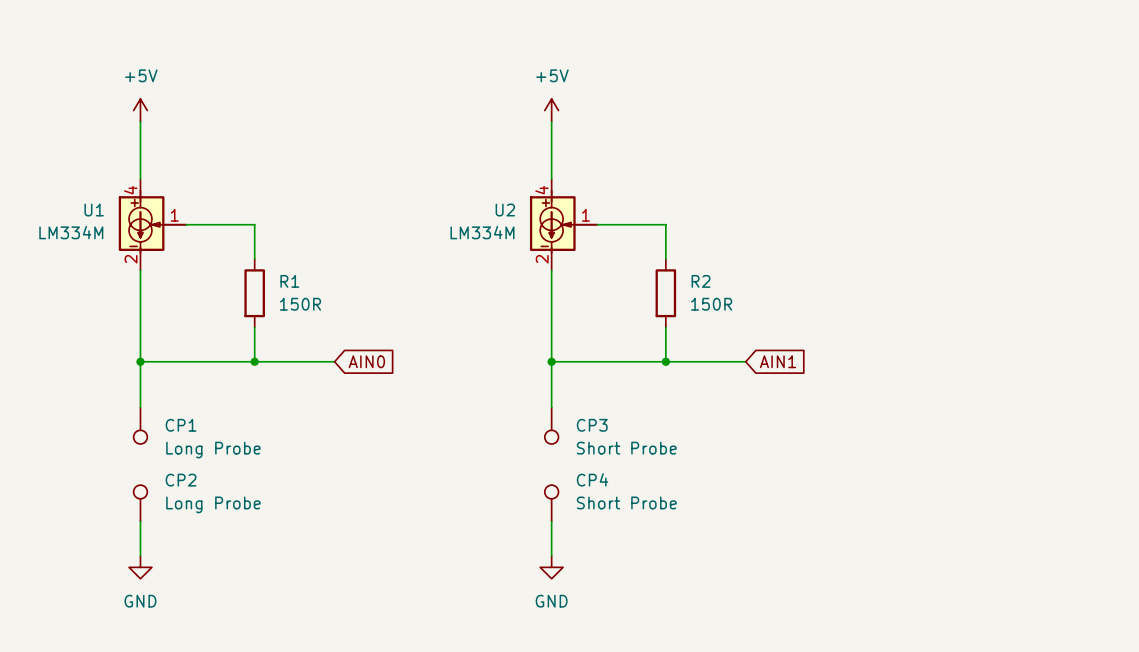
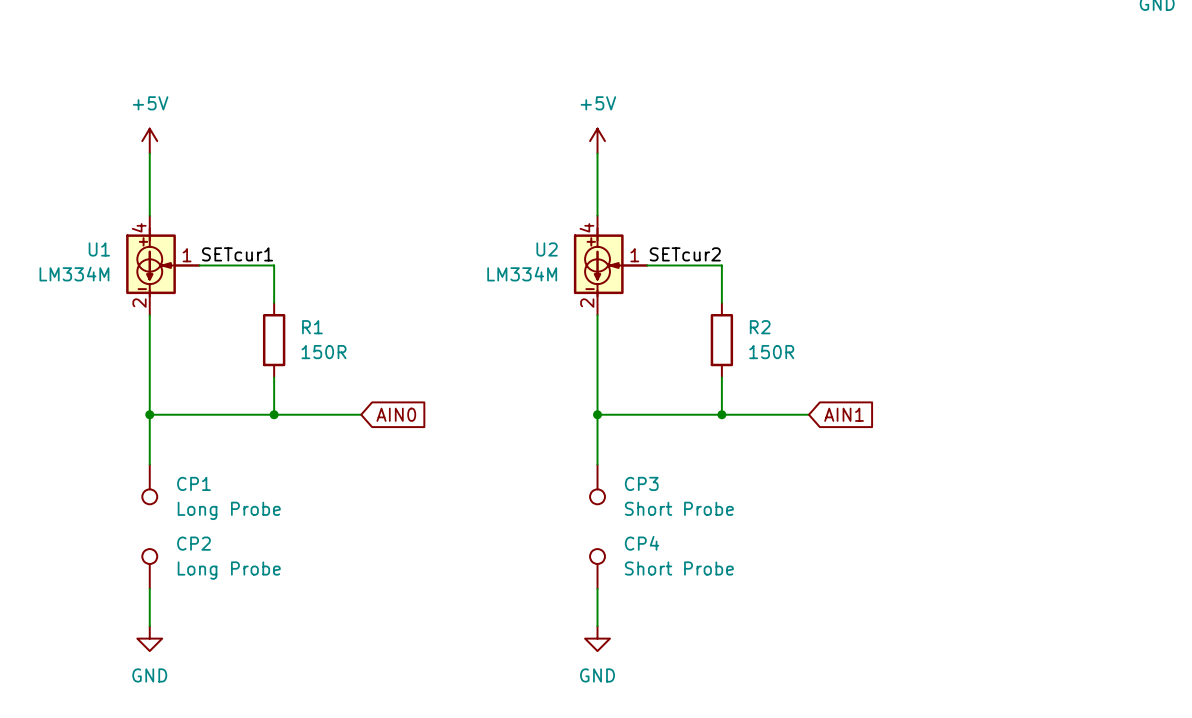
label: none -> SETcur1 (237, 254)
label: none -> SETcur2 (685, 254)

